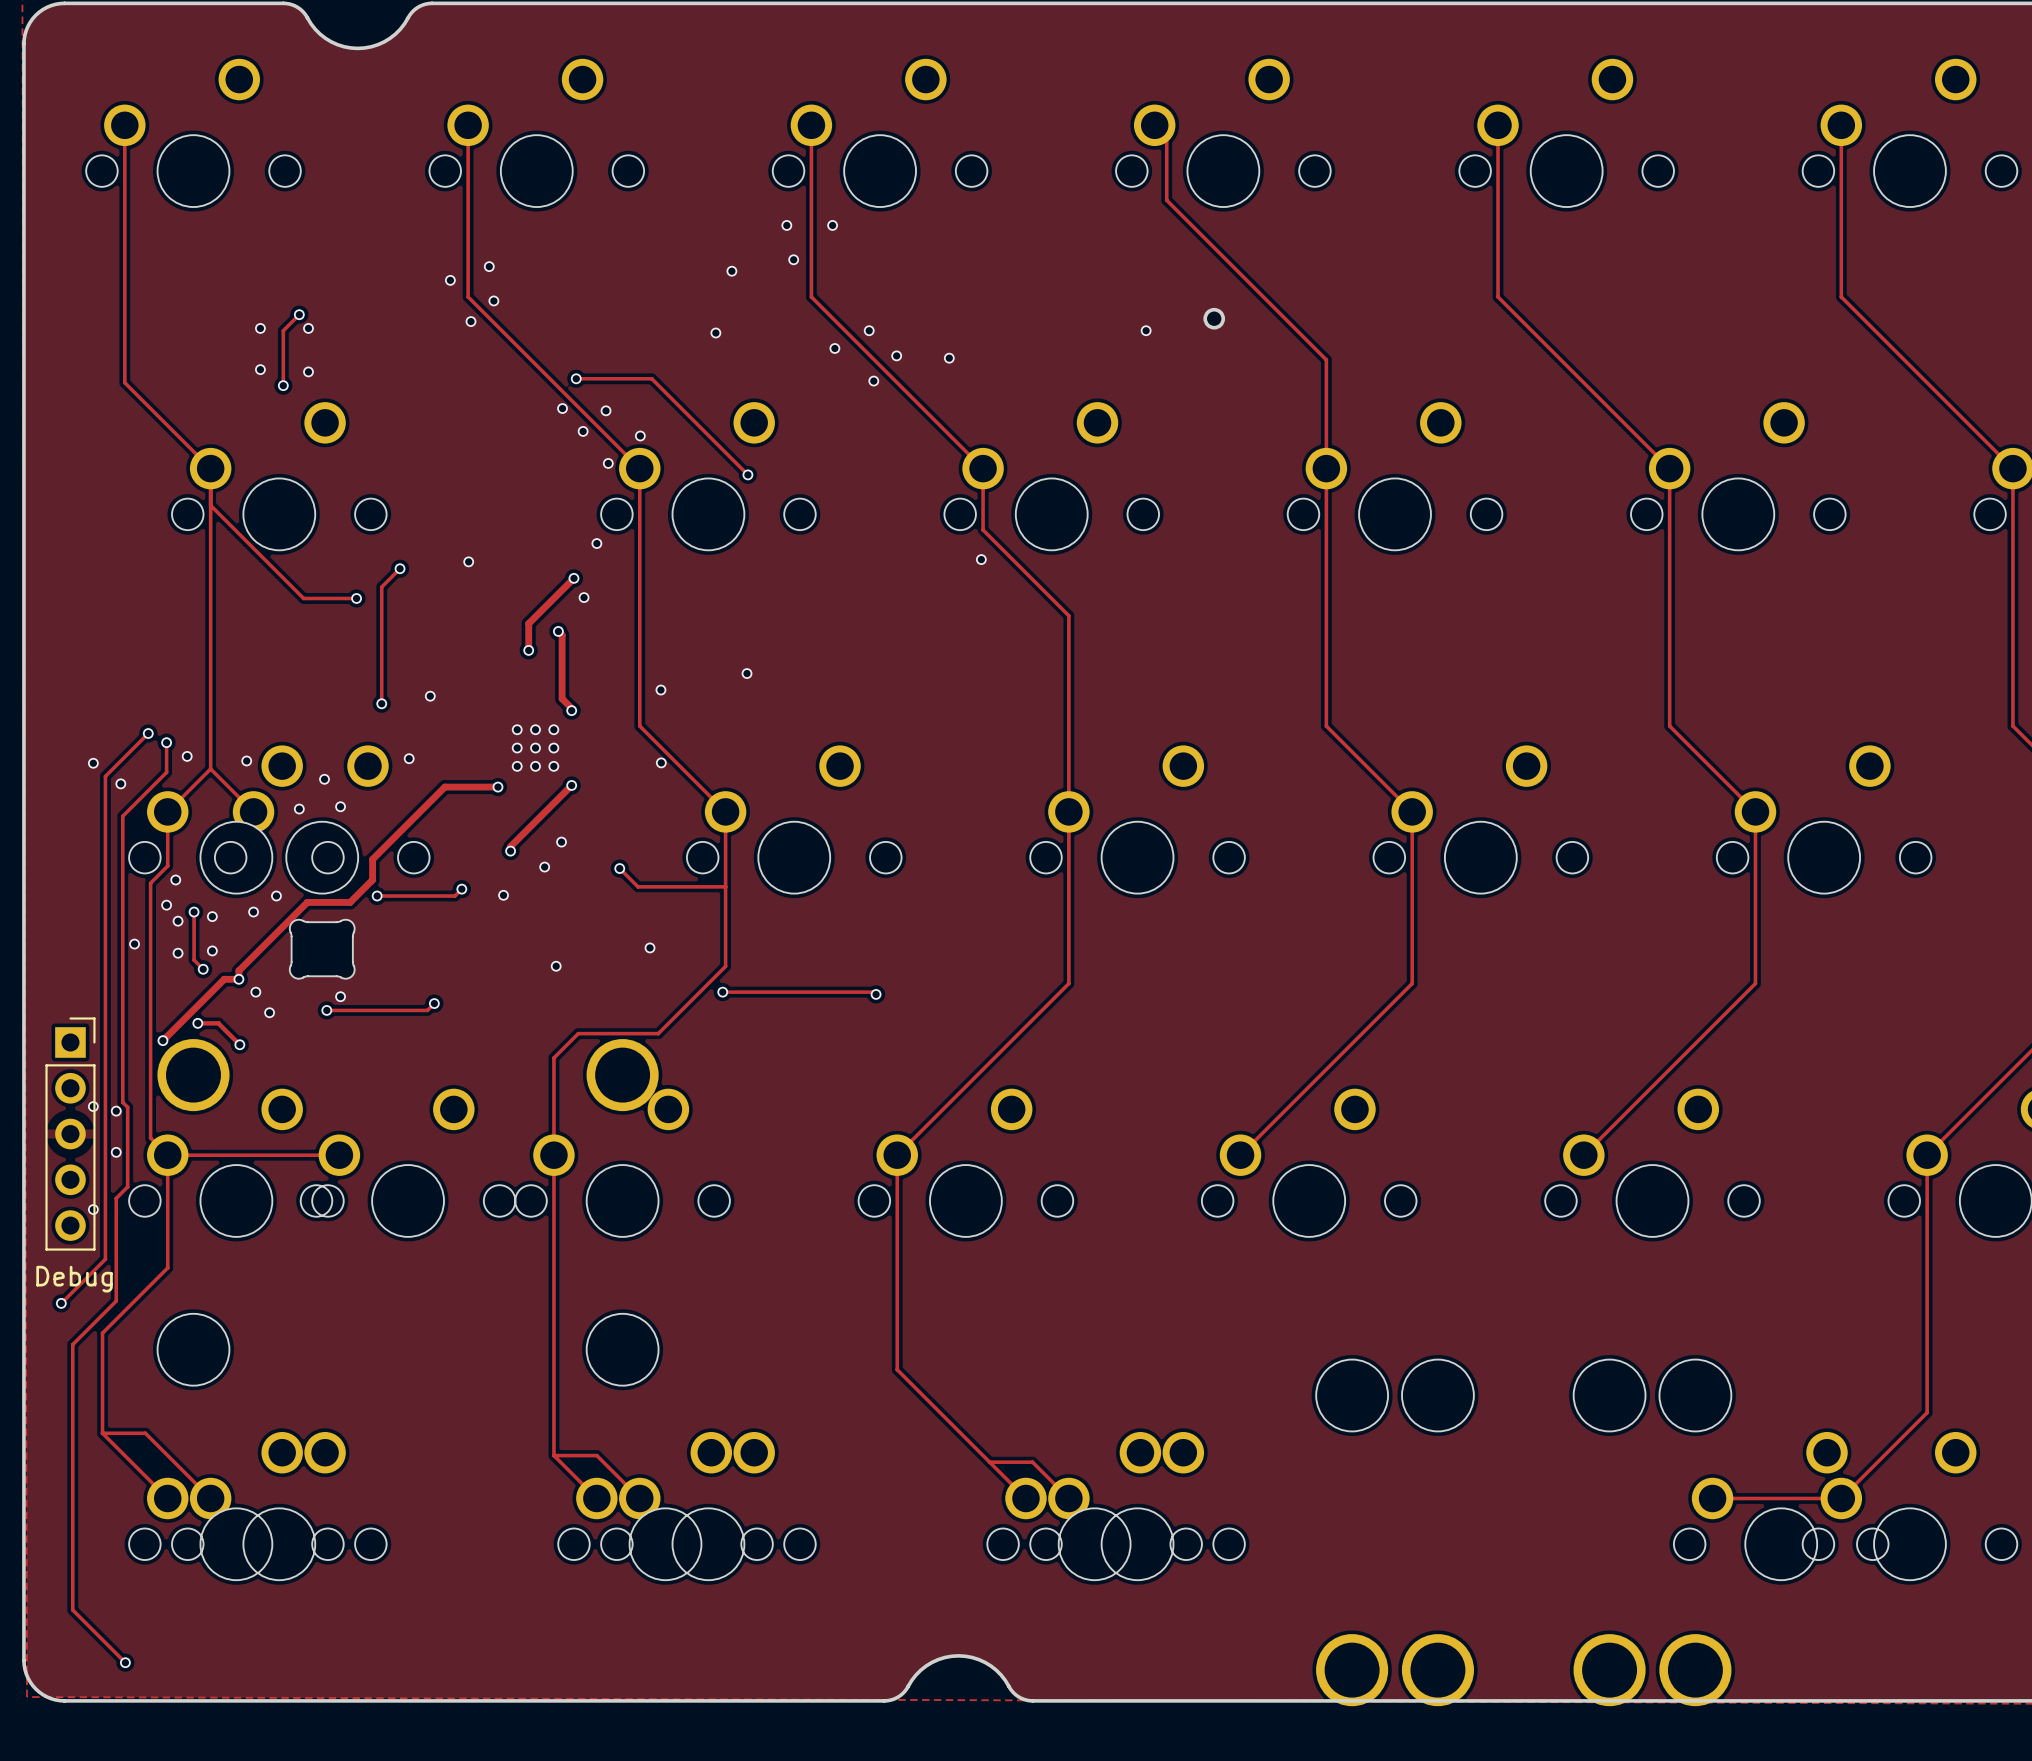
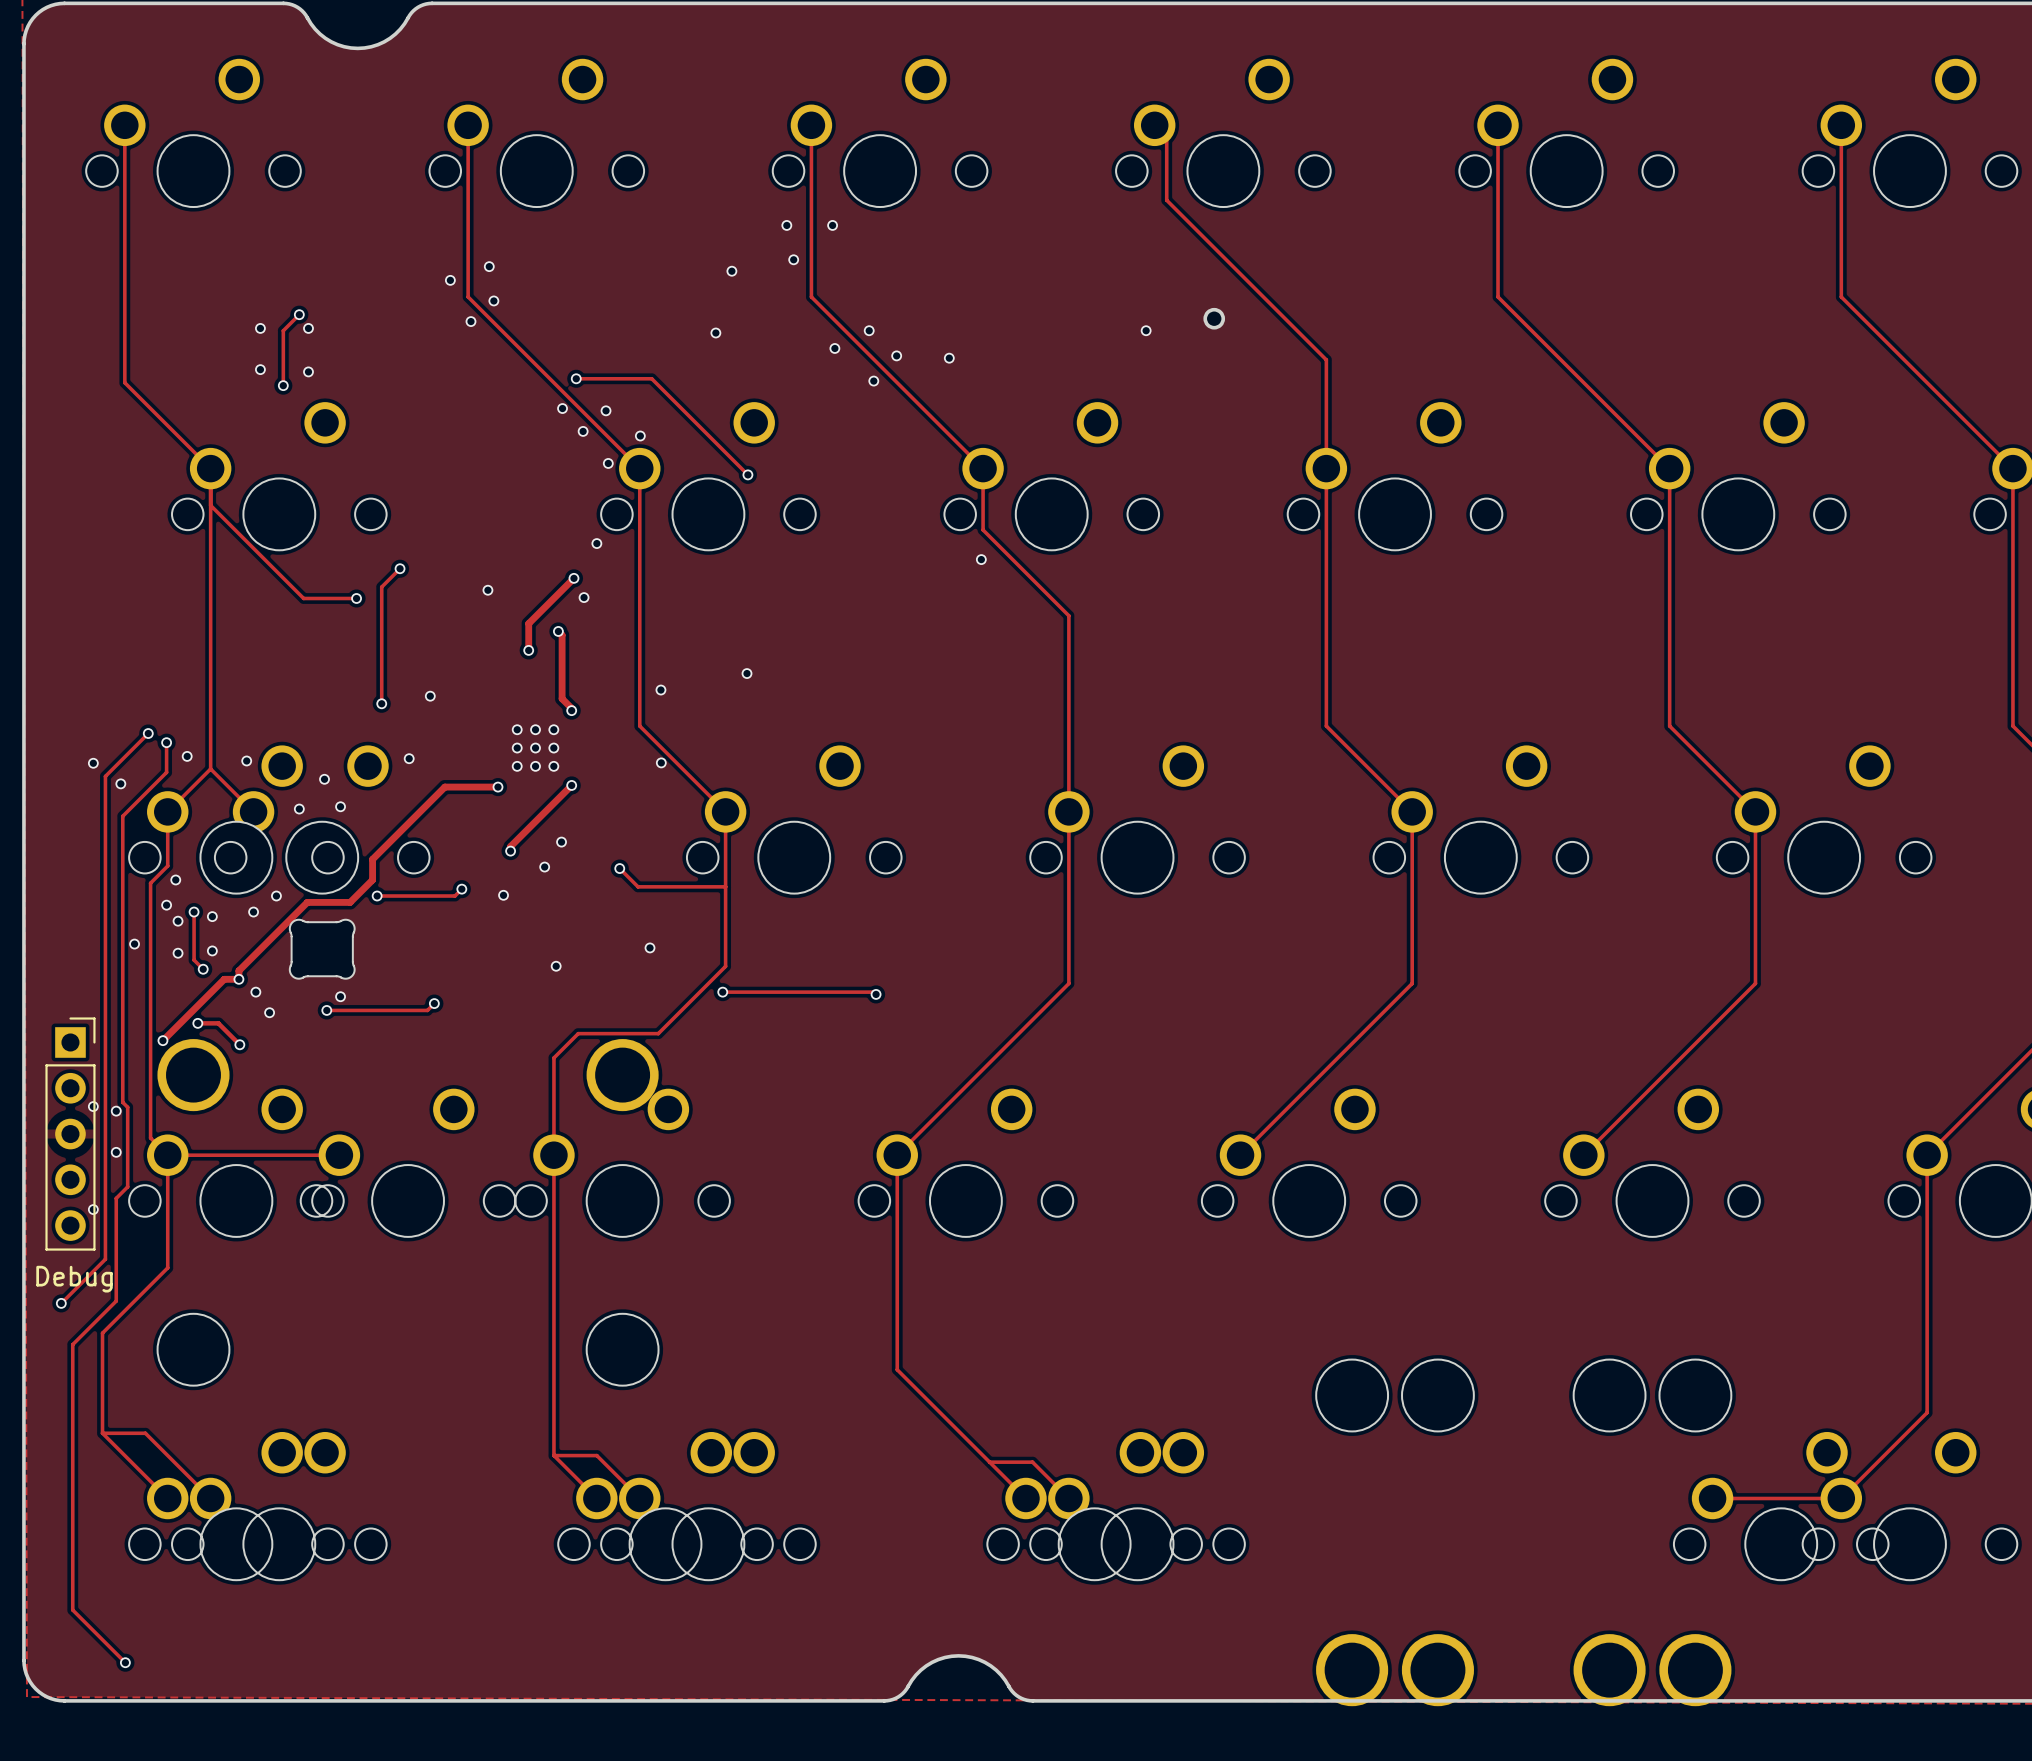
via position: (468, 561) -> (487, 590)

